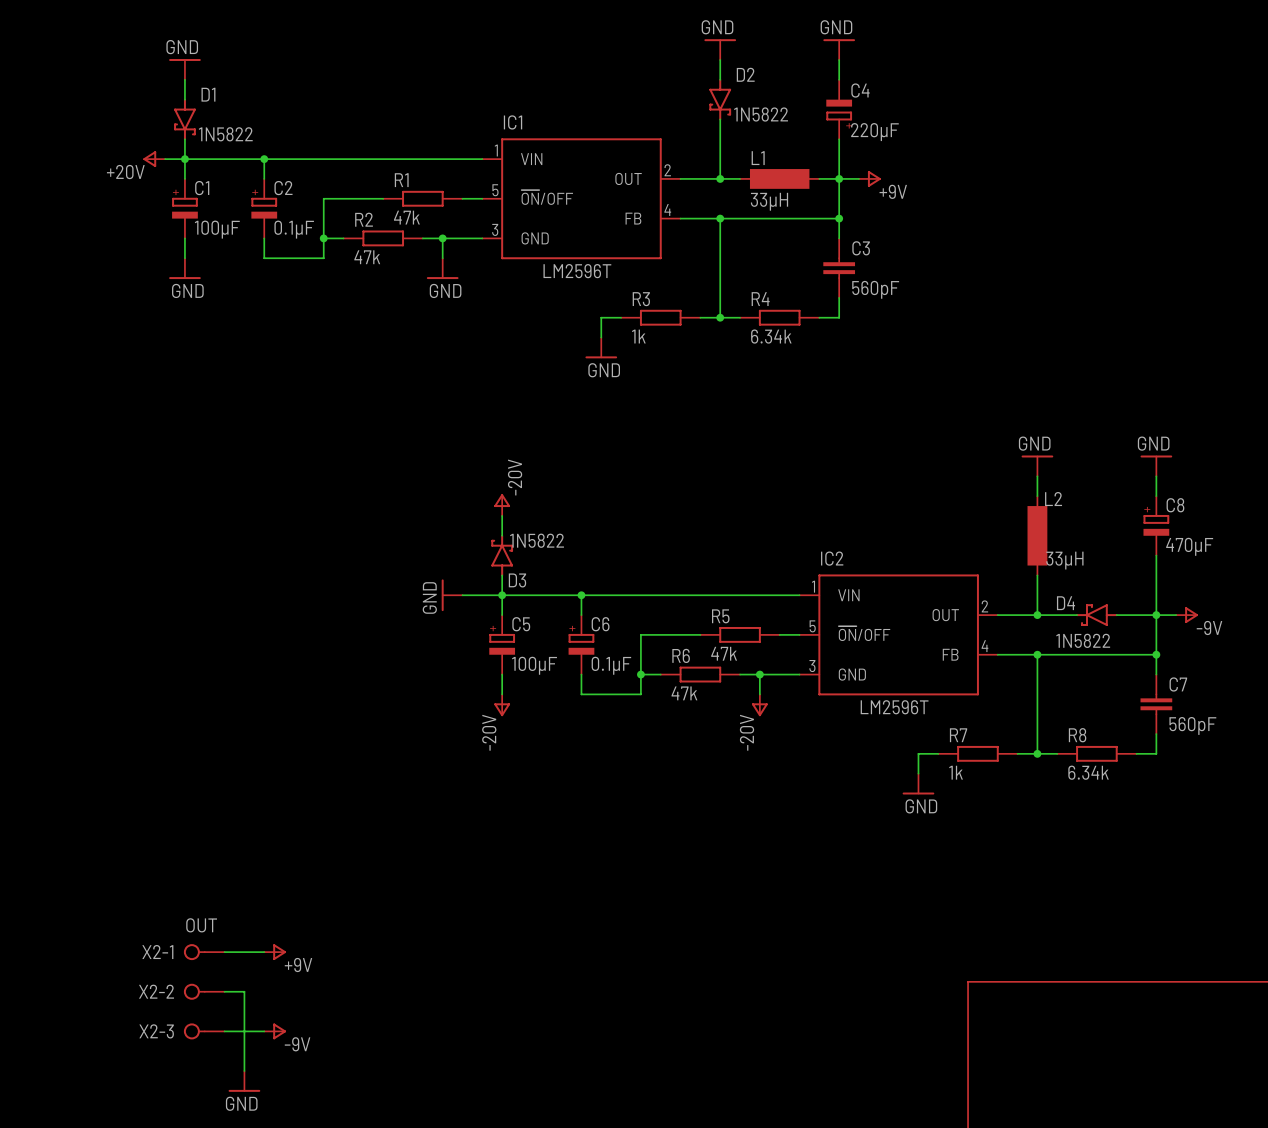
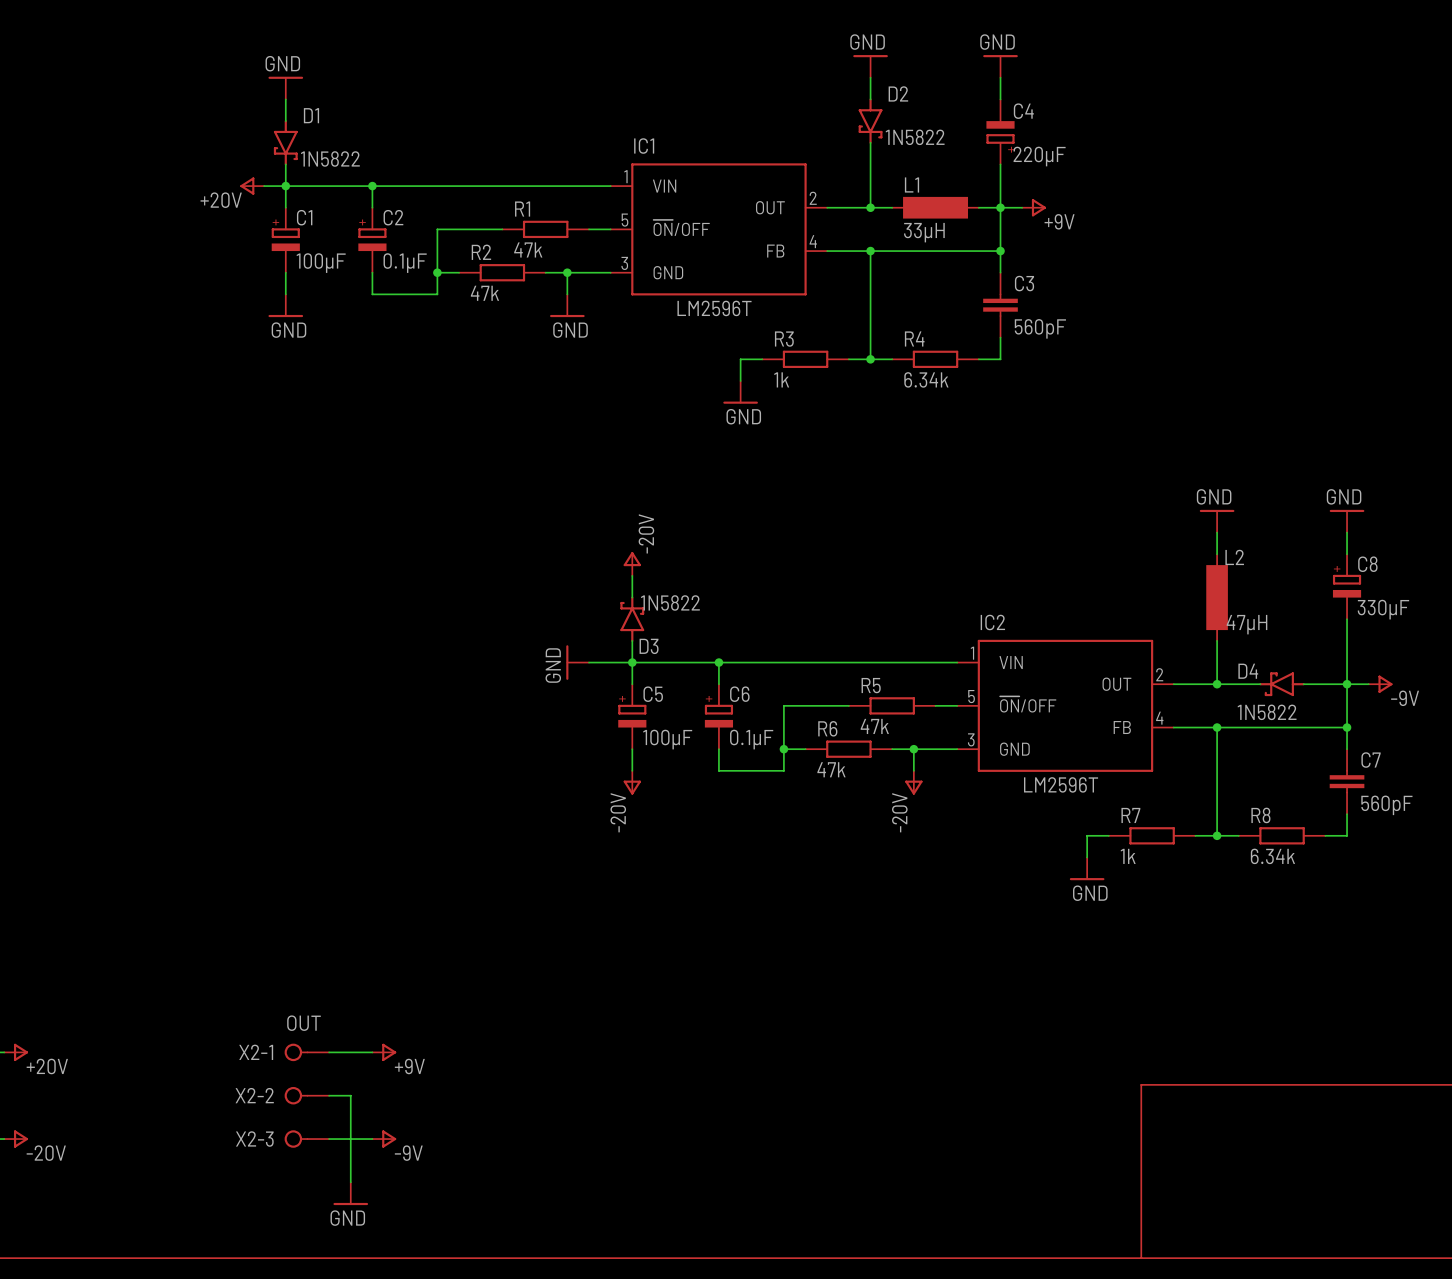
C8 value: 470µF (1189, 546) -> 330µF (1383, 609)
L2 value: 33µH (1064, 560) -> 47µH (1247, 624)

